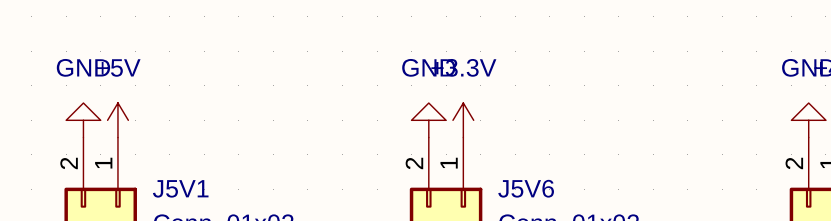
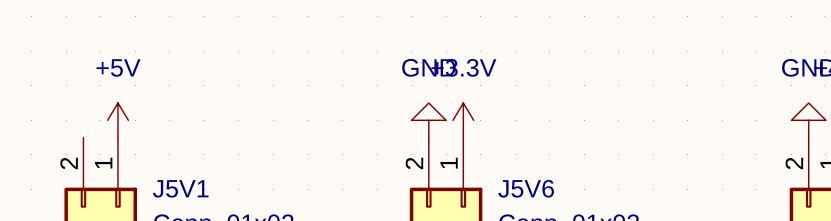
power symbol: GND (83, 120) -> none

